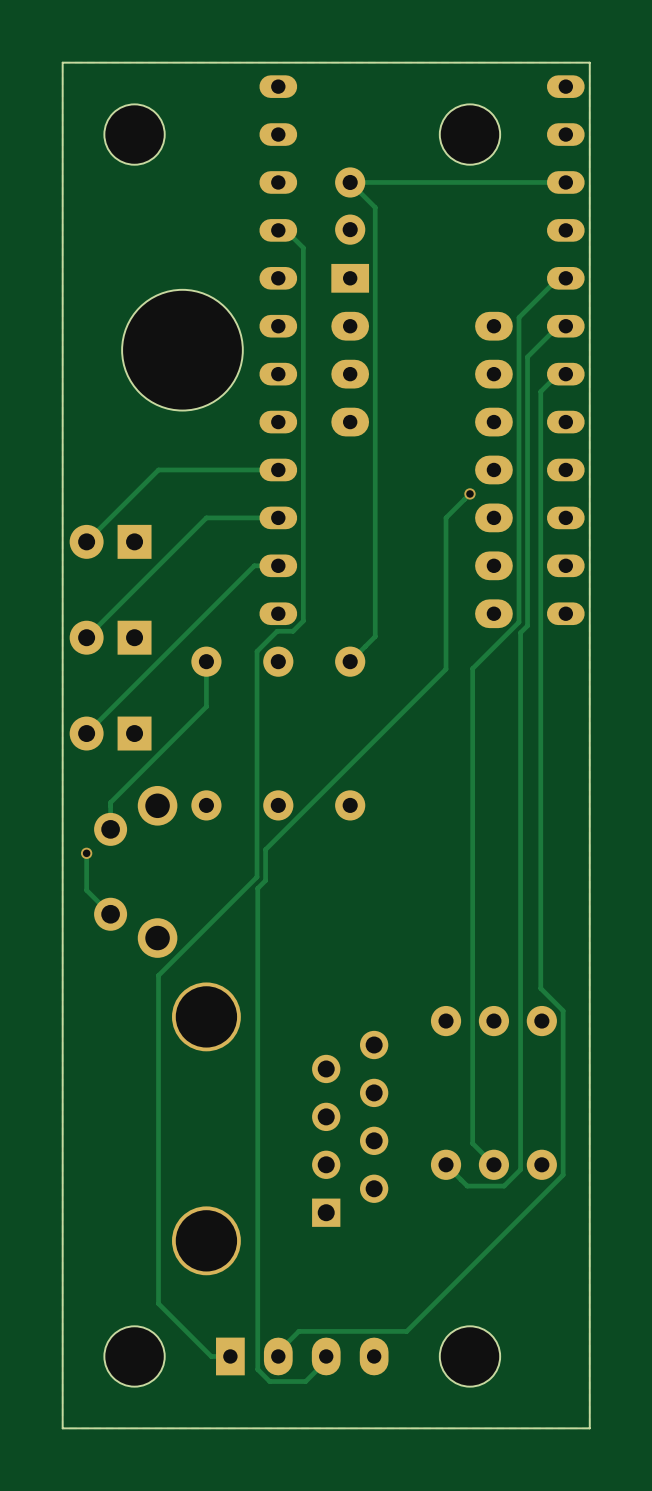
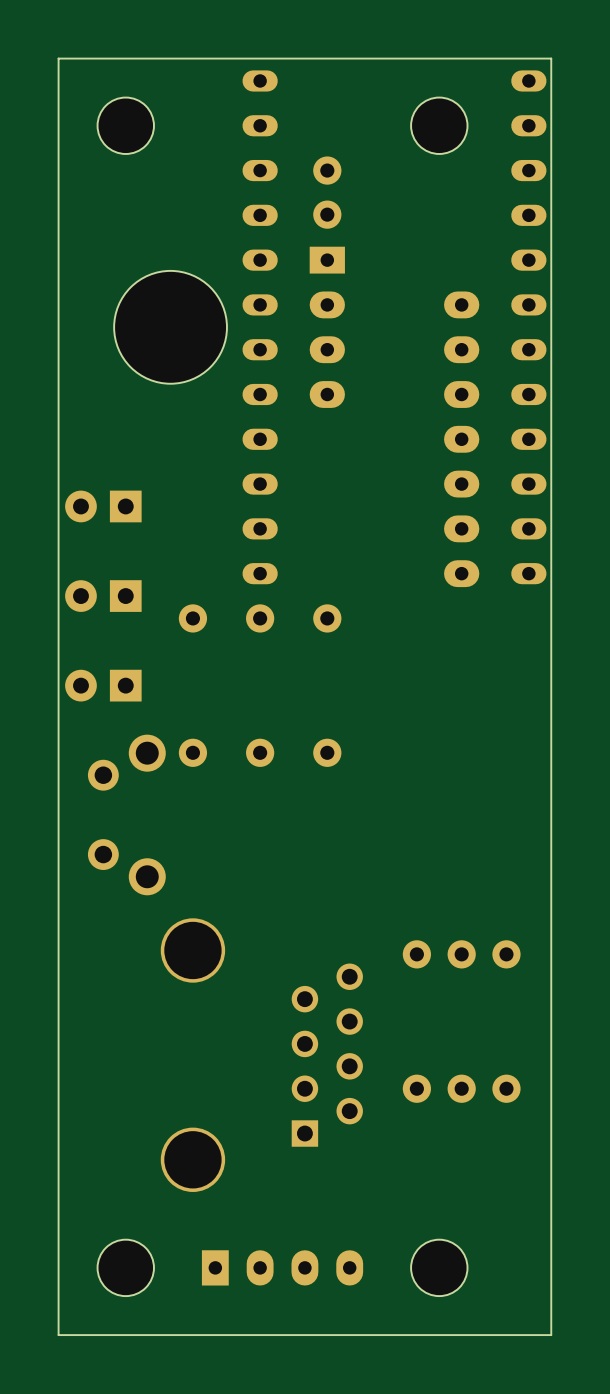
track: (565, 182) (350, 182) (375, 207) (375, 636) (350, 661) -> none
track: (278, 230) (285, 230) (303, 247) (303, 620) (293, 631) (277, 631) (257, 651) (257, 877) (158, 975) (158, 1303) (211, 1356) (230, 1356) -> none
track: (565, 278) (558, 278) (518, 317) (518, 622) (472, 668) (472, 1143) (493, 1164) -> none
track: (565, 326) (558, 326) (527, 356) (527, 625) (520, 632) (520, 1169) (504, 1186) (467, 1186) (446, 1164) -> none
track: (565, 374) (558, 374) (540, 391) (540, 988) (563, 1010) (563, 1175) (406, 1331) (298, 1331) (278, 1351) (278, 1356) -> none
track: (278, 469) (158, 469) (86, 541) -> none
track: (469, 493) (446, 517) (446, 669) (265, 849) (265, 880) (257, 888) (257, 1369) (269, 1381) (305, 1381) (326, 1360) (326, 1356) -> none
via: (469, 493) -> none
track: (278, 517) (206, 517) (86, 637) -> none
track: (278, 565) (254, 565) (86, 733) -> none
track: (206, 661) (206, 706) (110, 802) (110, 829) -> none
track: (86, 853) (86, 890) (110, 914) -> none
via: (86, 853) -> none

